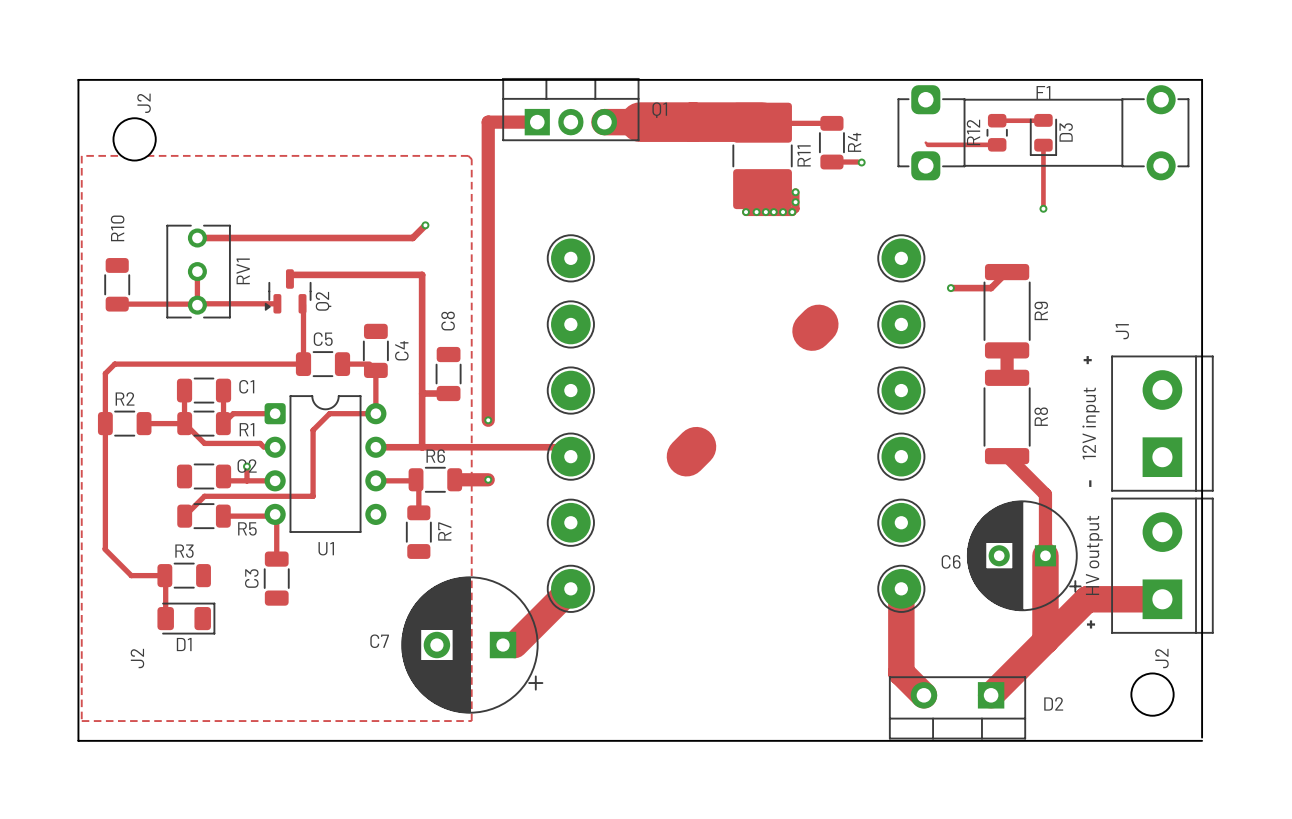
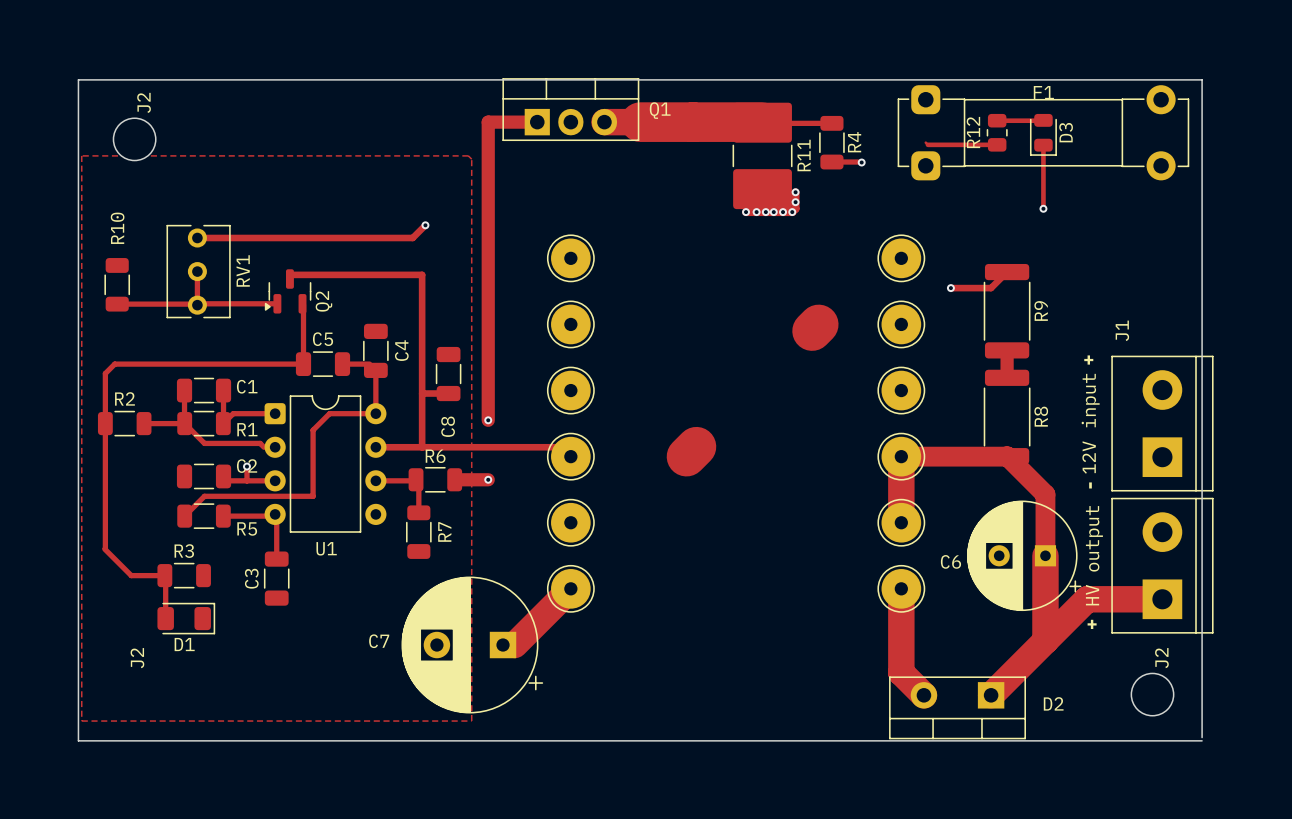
C8 name position: C8 (448, 321) -> C8 (448, 426)
track: none -> (1007, 456) (901, 456) (901, 522)
track width: thin (1007, 456) (1045, 494) (1045, 555) -> thick (1007, 456) (1045, 494) (1045, 555)

